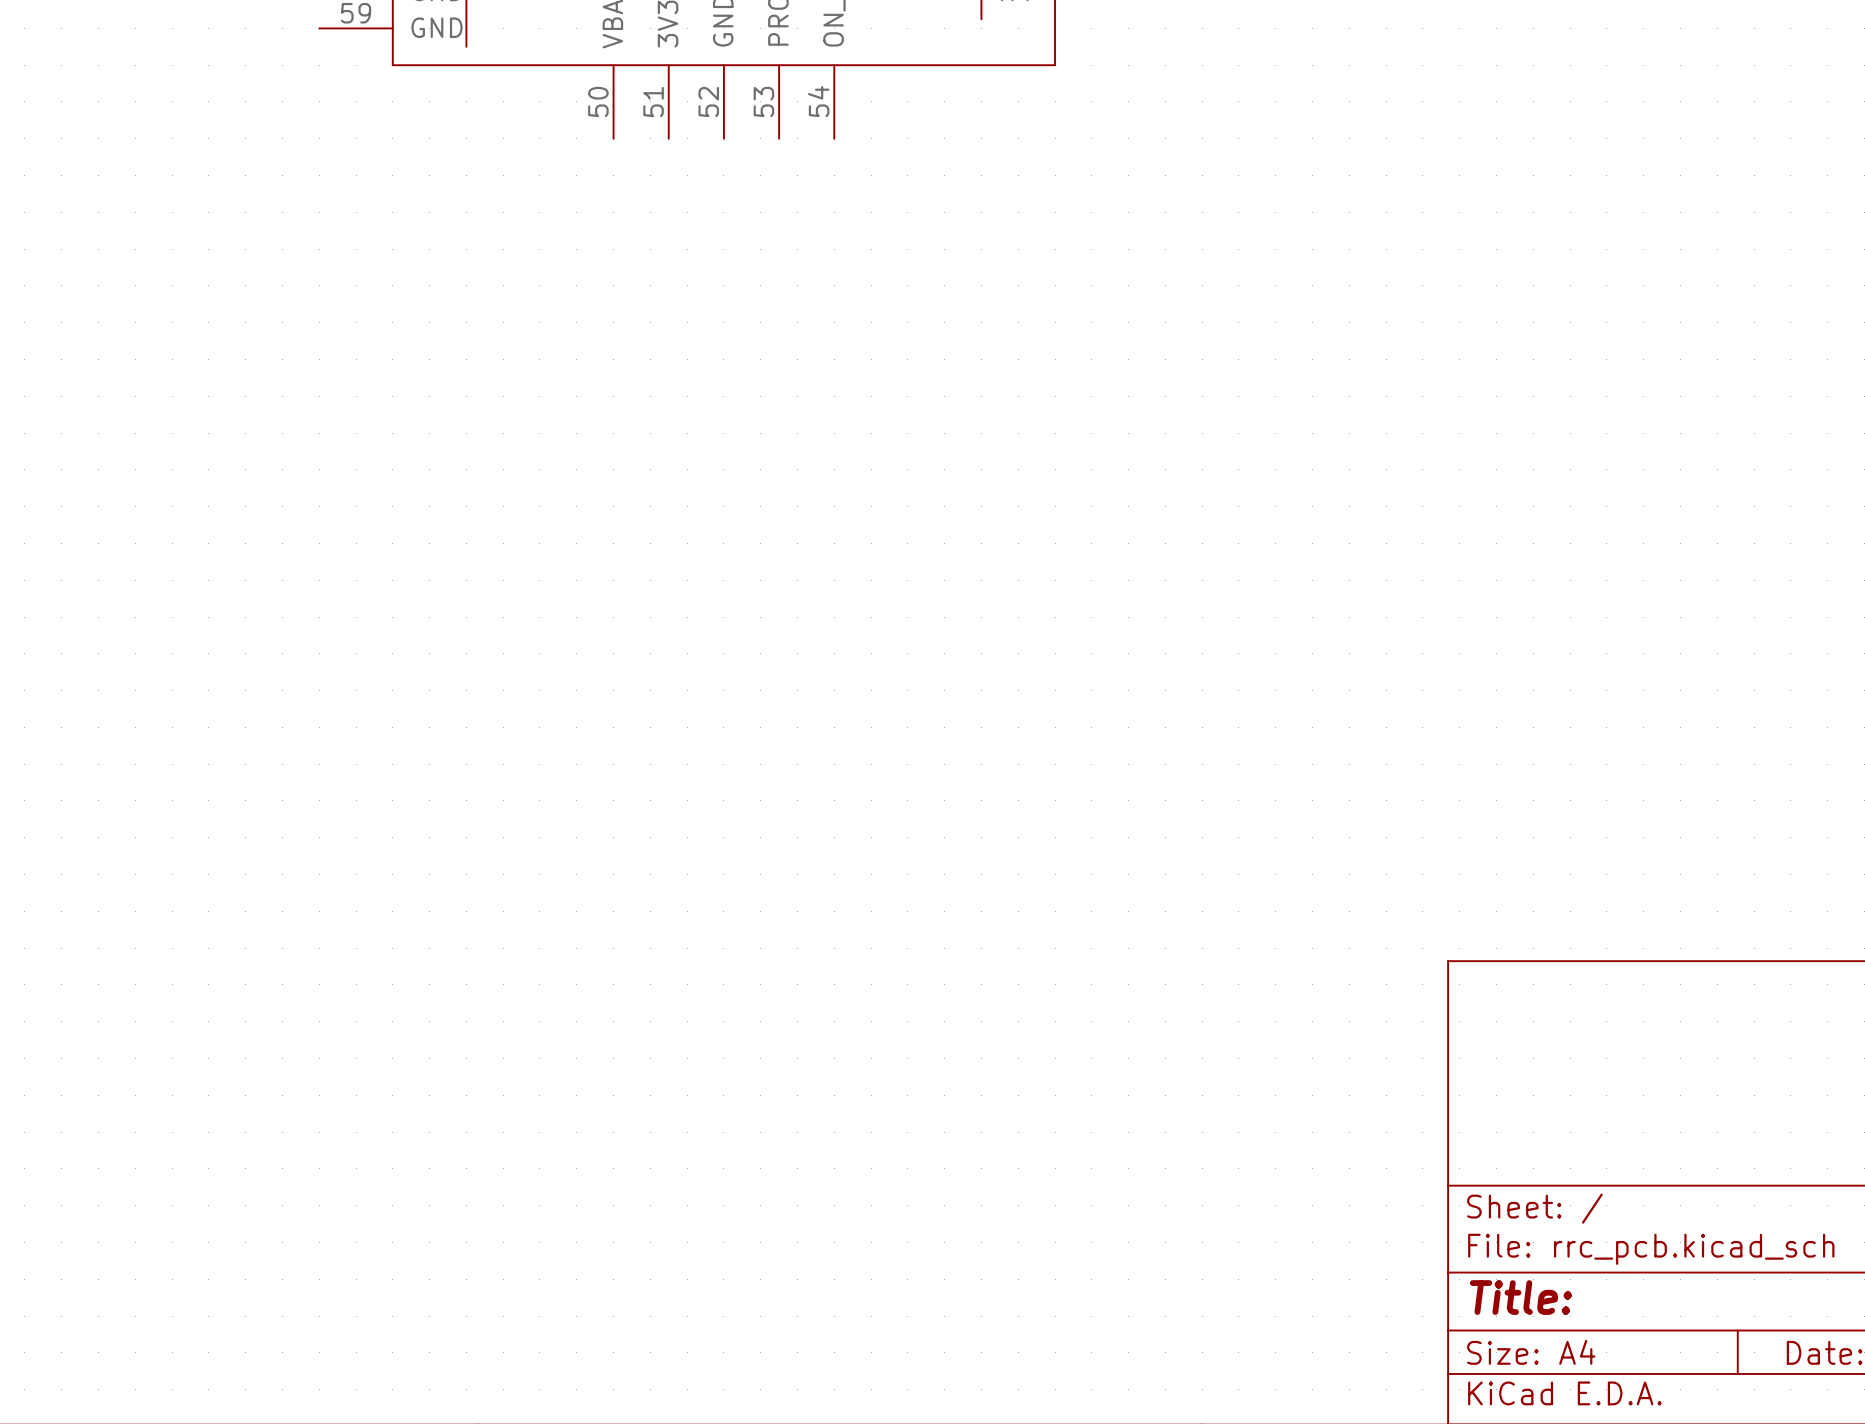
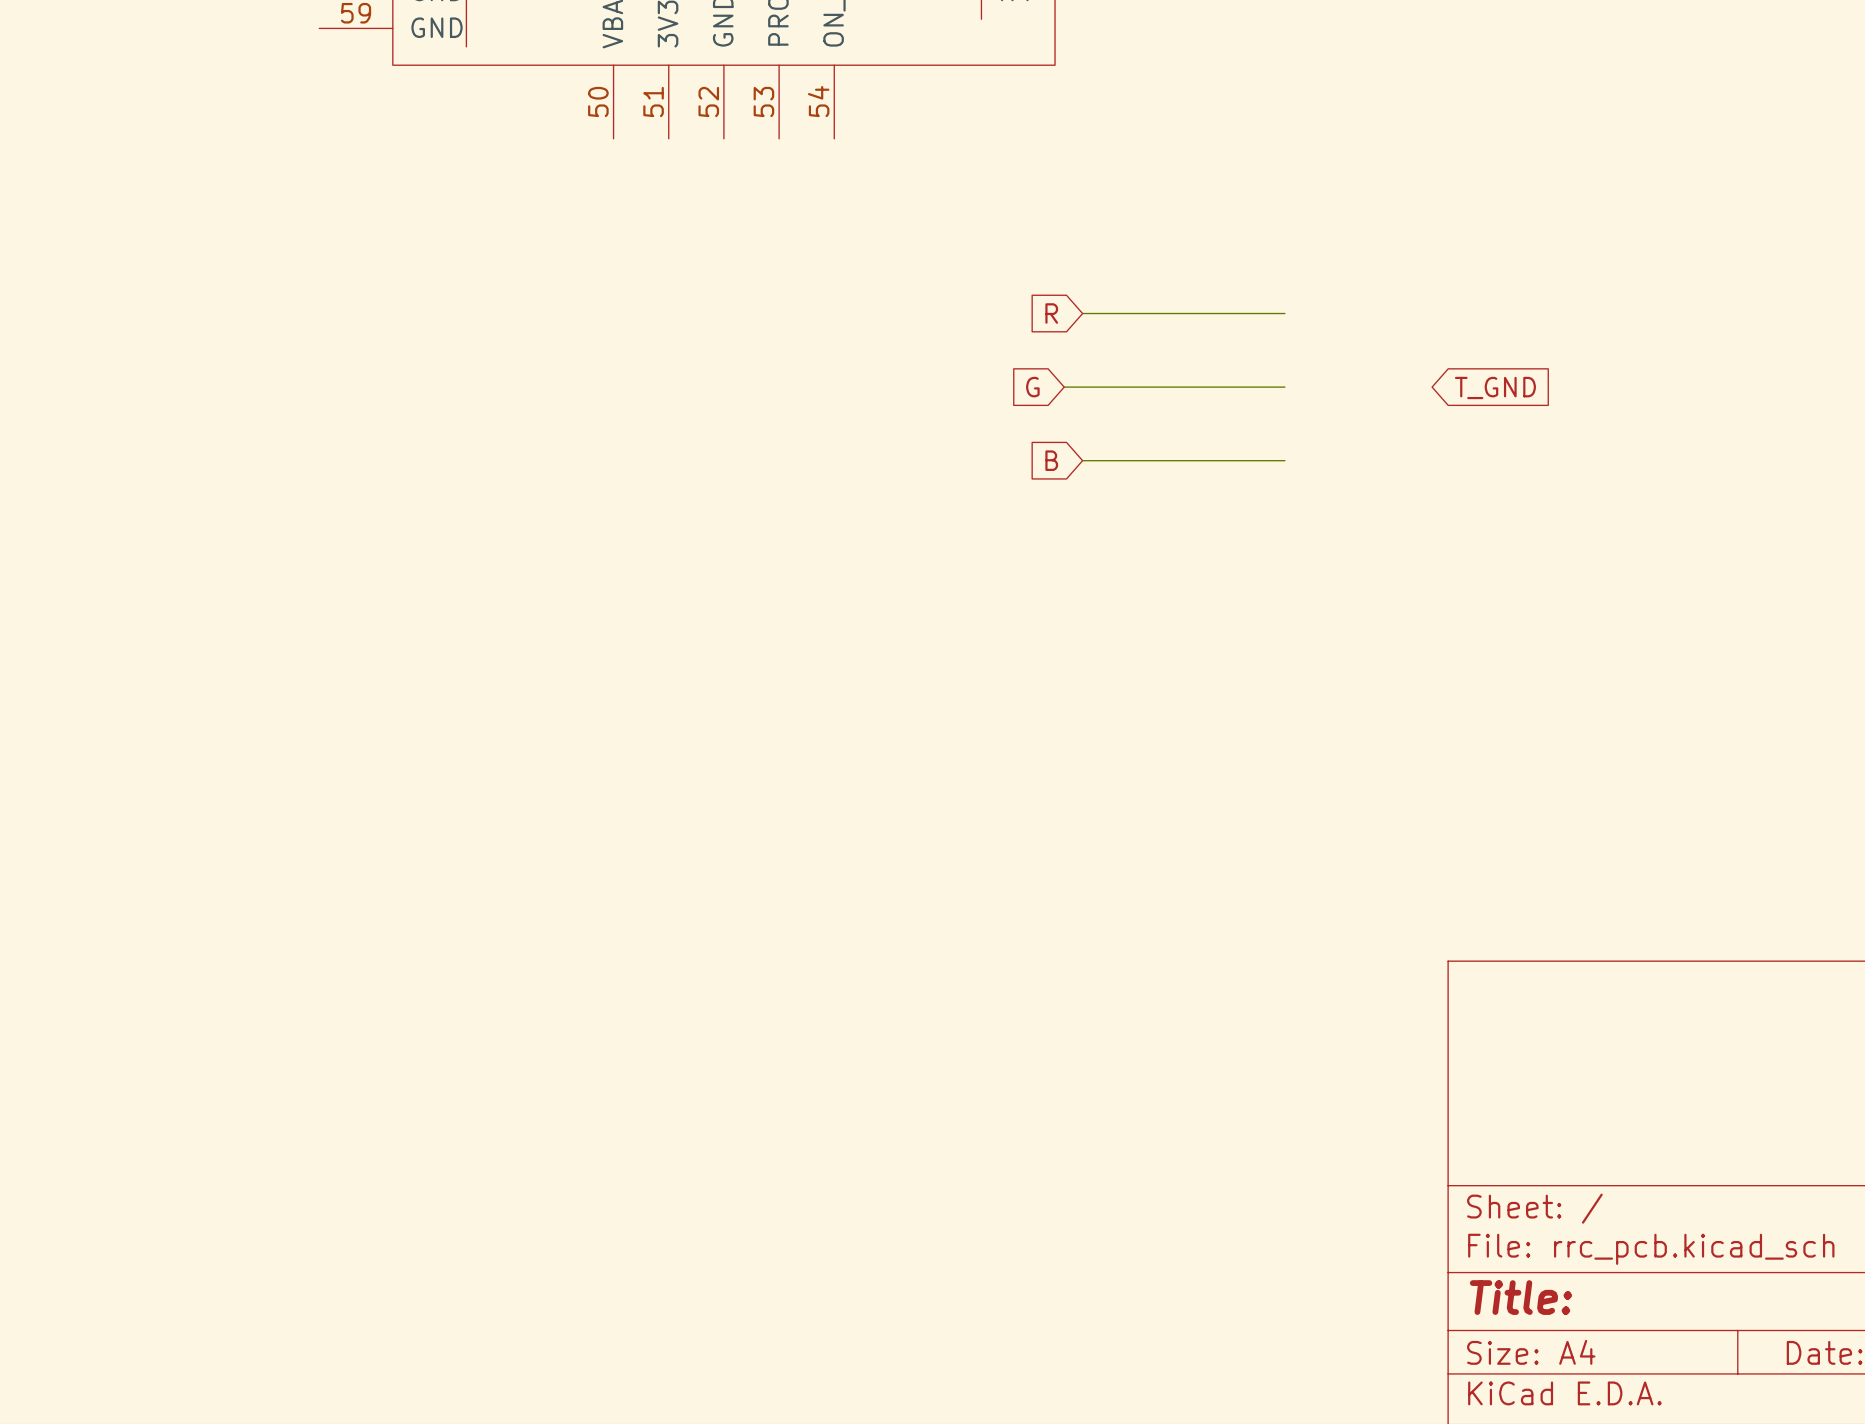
global label: none -> R (1051, 313)
wire: none -> (1082, 313) (1284, 313)
global label: none -> G (1032, 387)
wire: none -> (1064, 387) (1284, 387)
global label: none -> T_GND (1495, 387)
global label: none -> B (1051, 460)
wire: none -> (1082, 460) (1284, 460)

